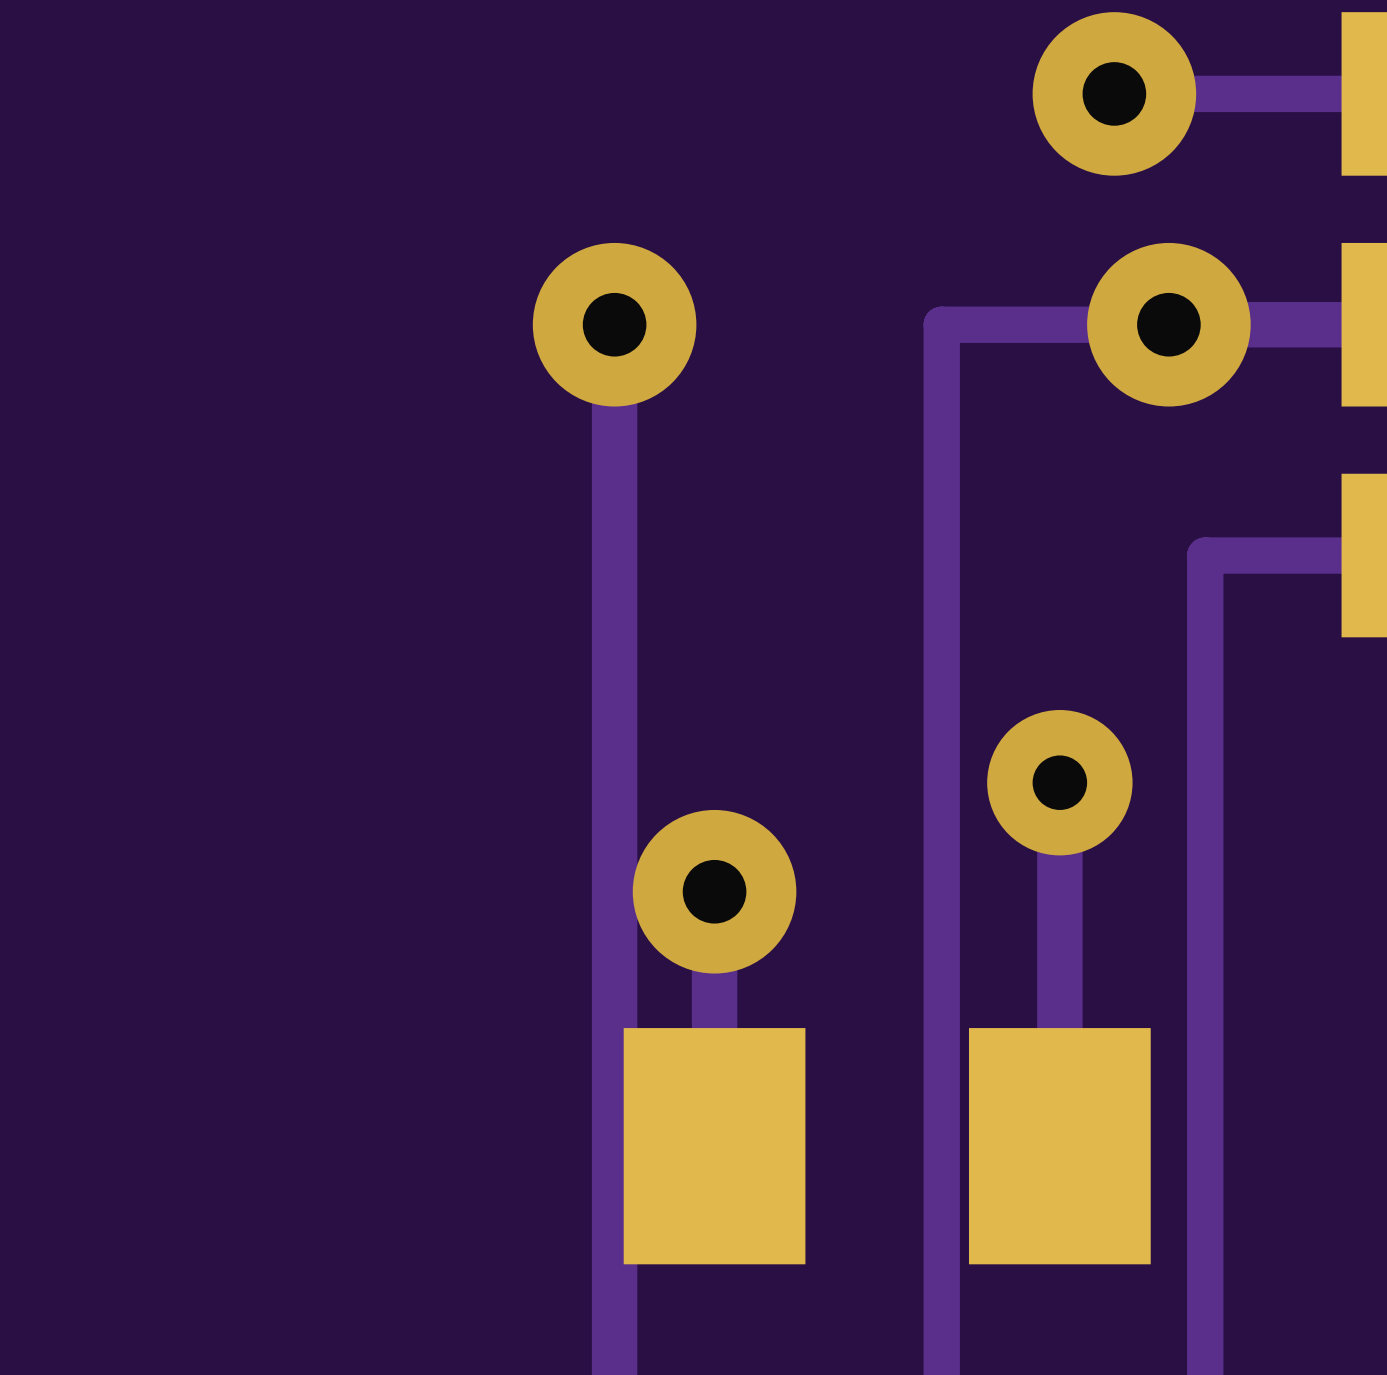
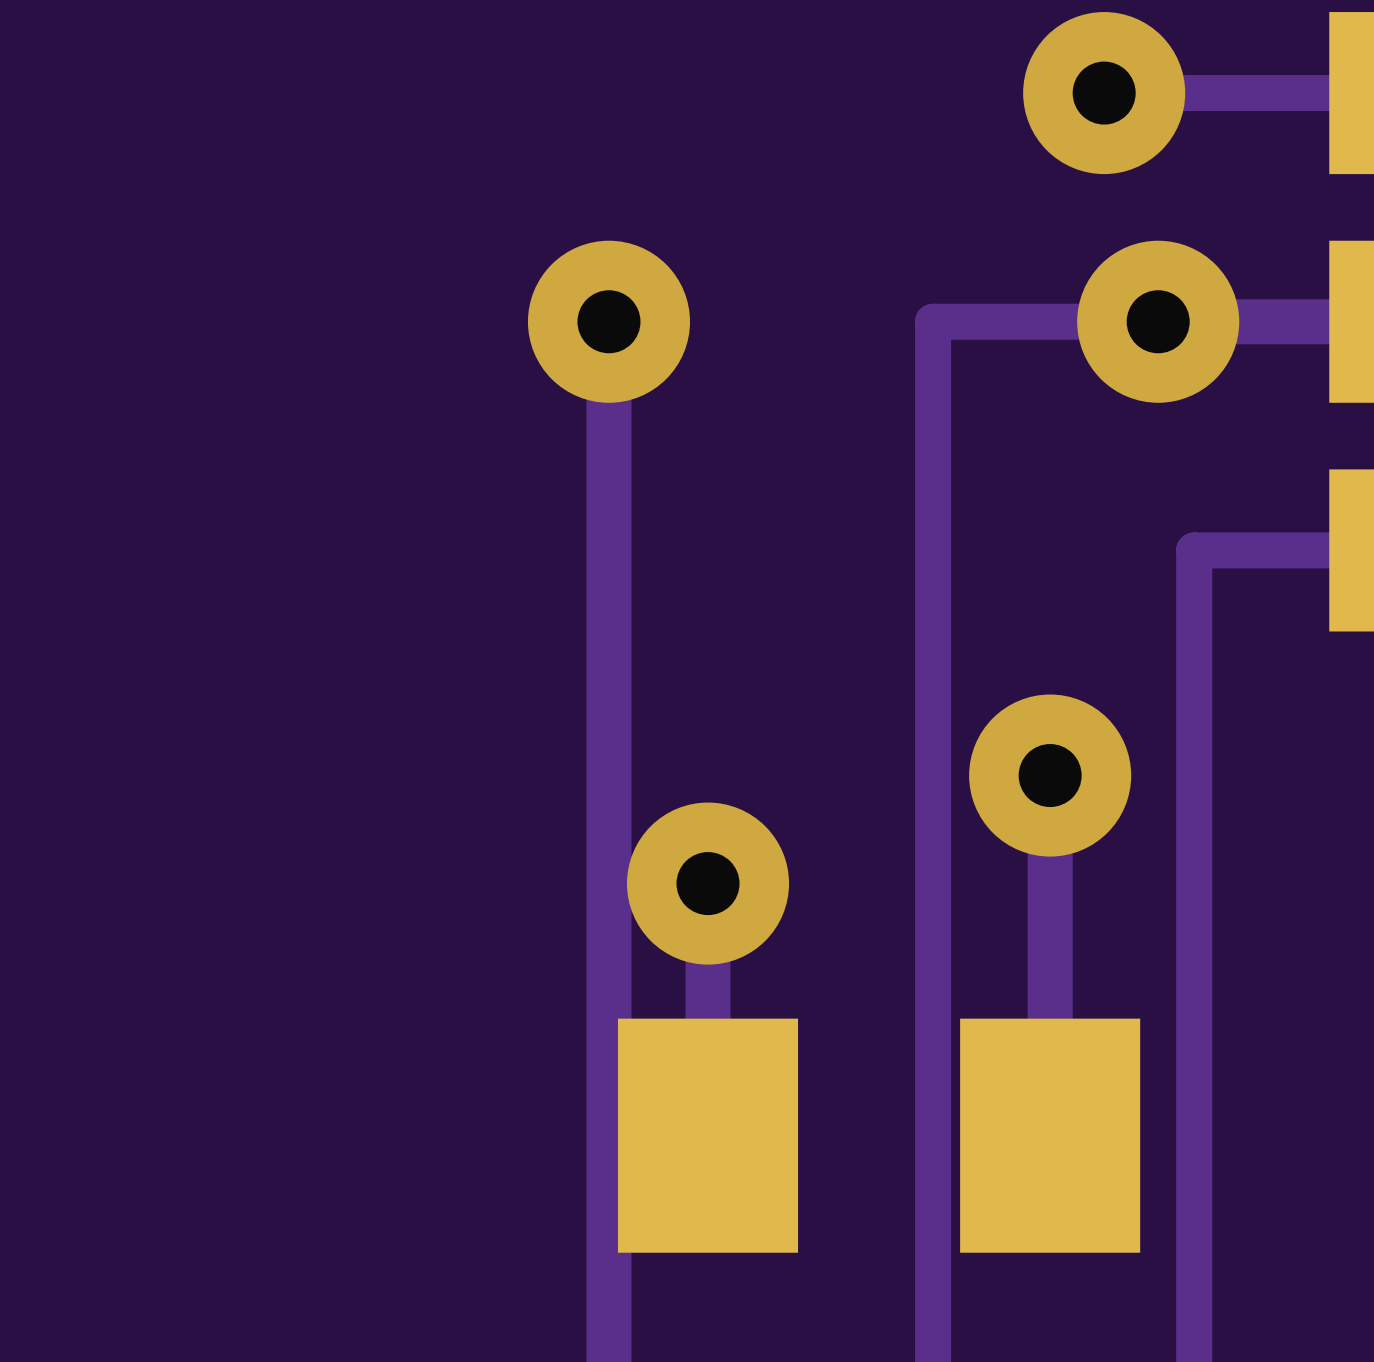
via size: [987, 710, 1133, 856] -> [969, 694, 1132, 857]

